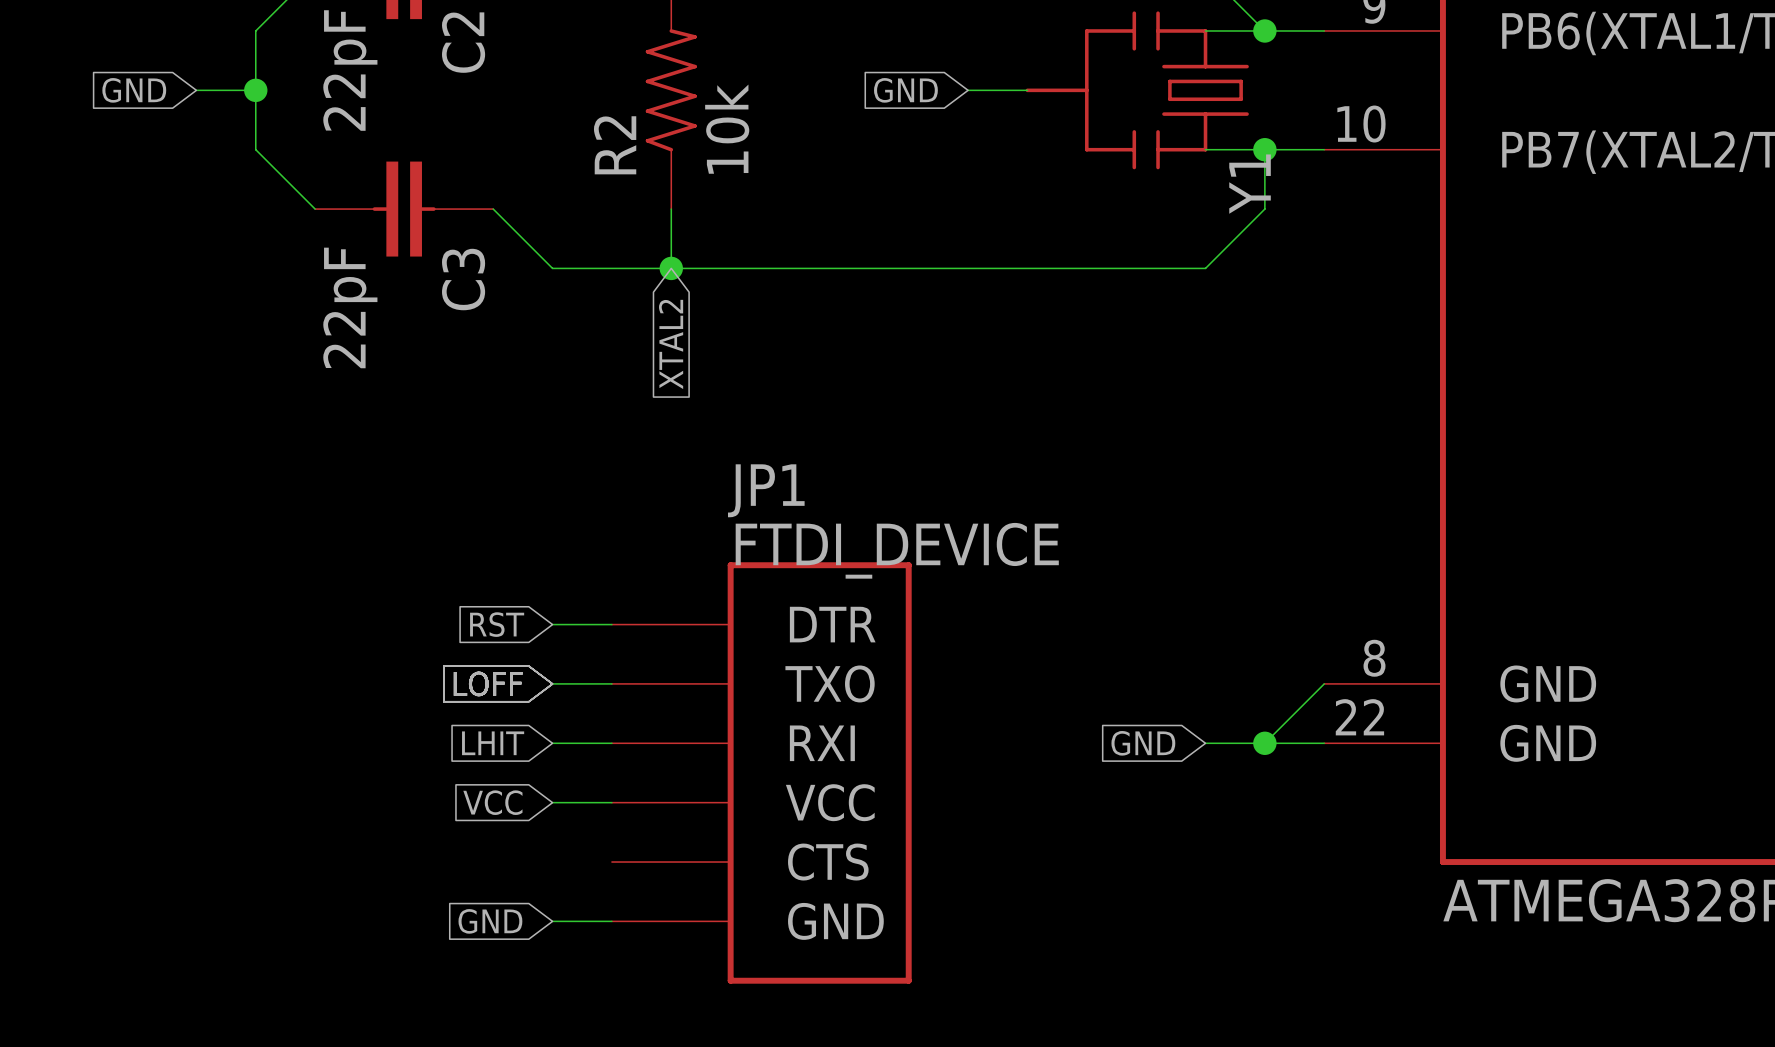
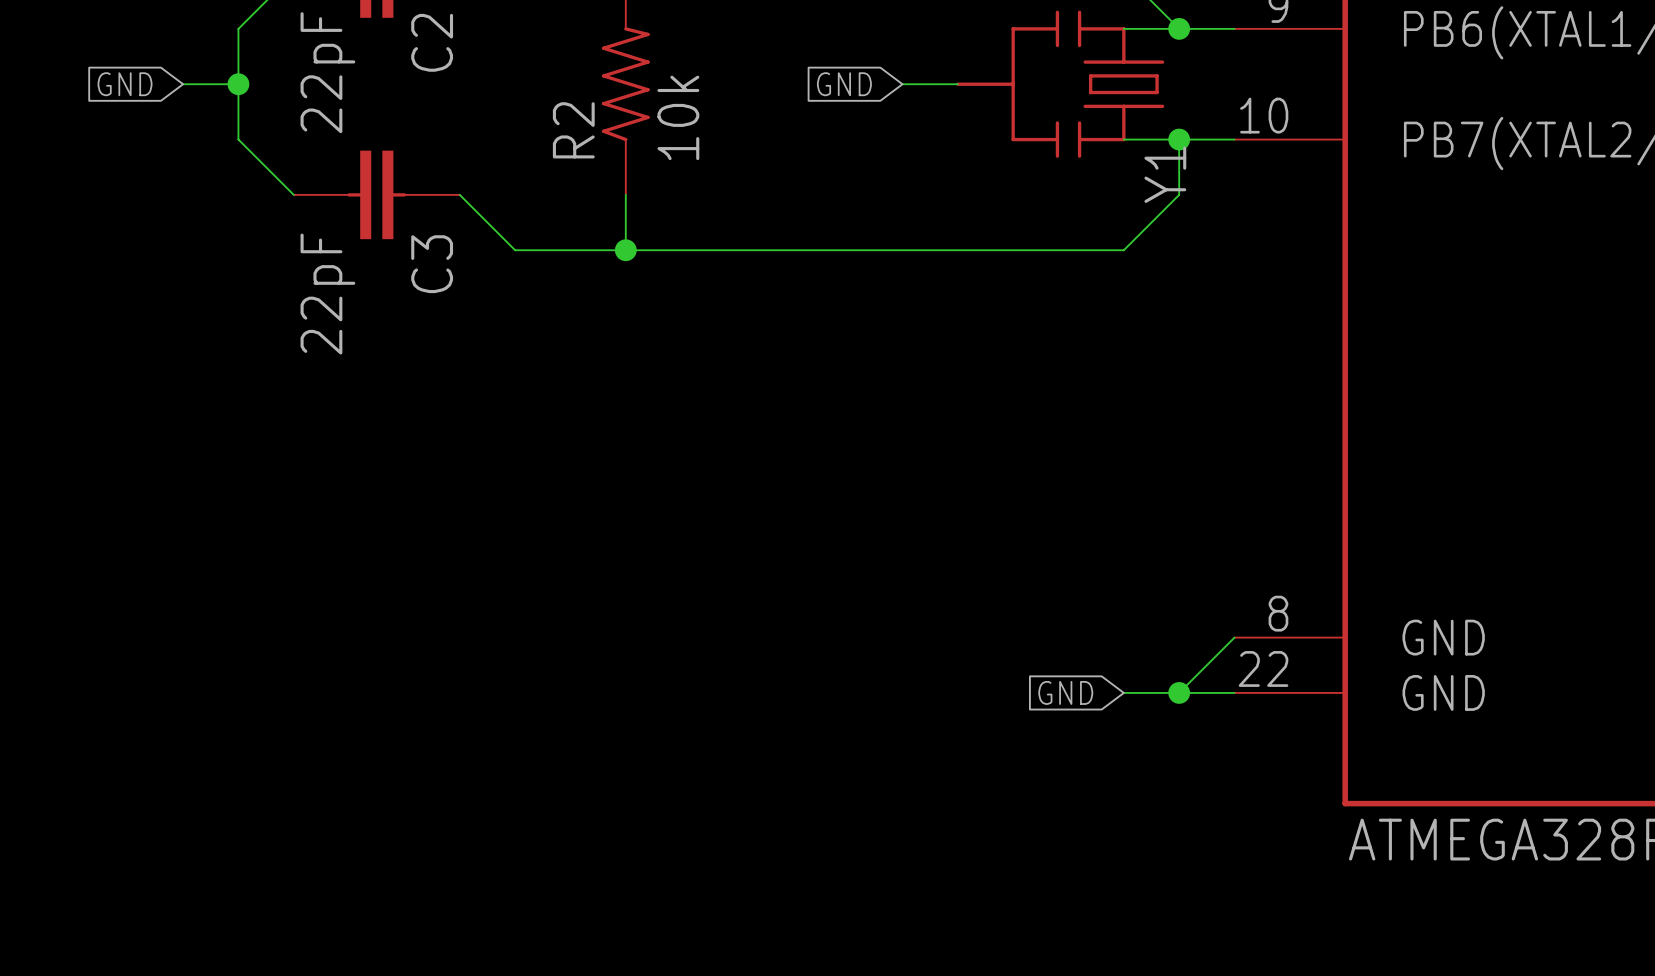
global label: XTAL2 (671, 344) -> none
global label: RST (497, 624) -> none
wire: (552, 624) (611, 624) -> none
global label: LOFF (488, 683) -> none
wire: (552, 683) (611, 683) -> none
global label: LHIT (493, 743) -> none
wire: (552, 743) (611, 743) -> none
JP1: FTDI_DEVICE (761, 772) -> none
global label: VCC (492, 802) -> none
wire: (552, 802) (611, 802) -> none
global label: GND (490, 921) -> none
wire: (552, 921) (611, 921) -> none

